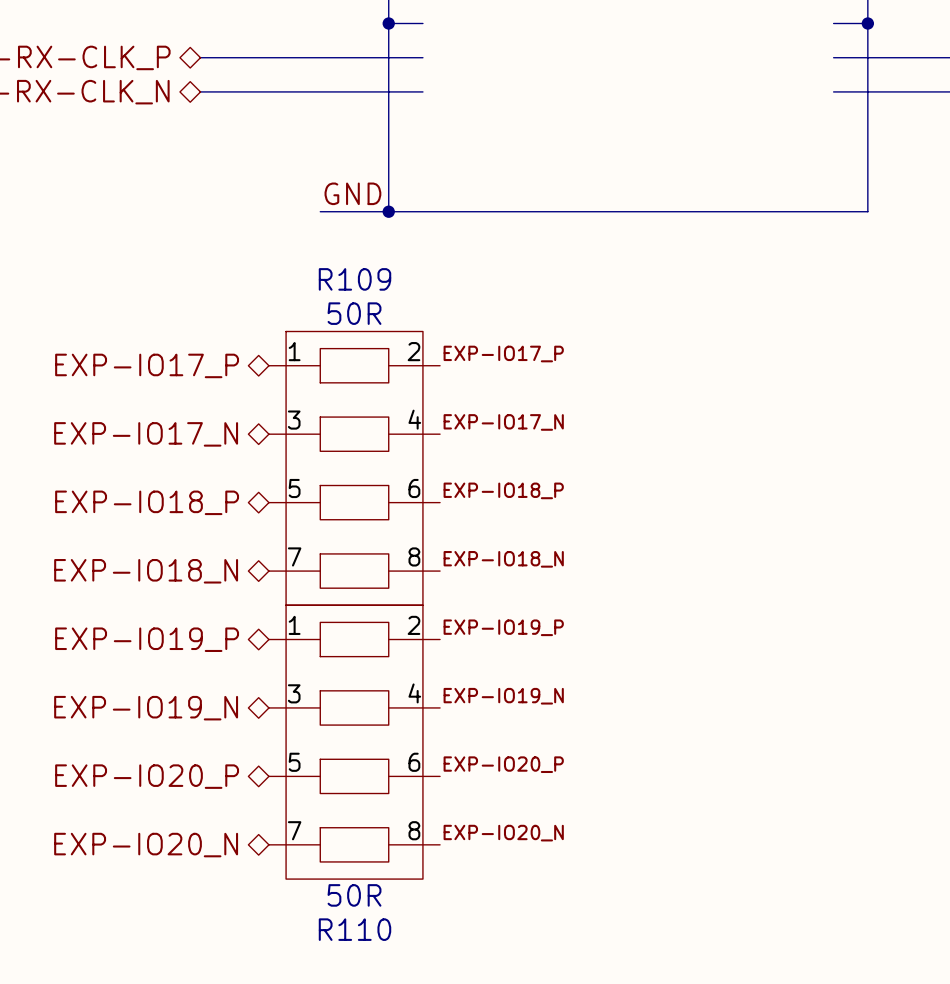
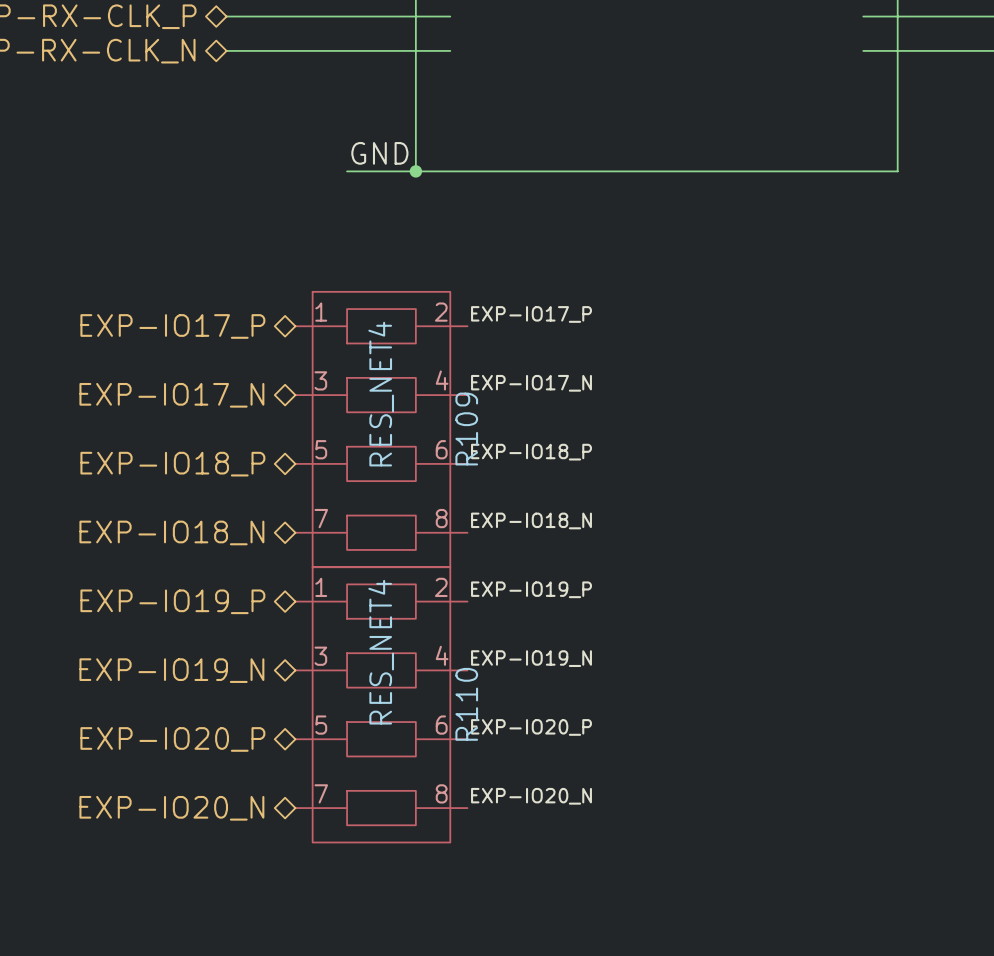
R109 name rotation: 0° (354, 279) -> 90° counterclockwise (466, 429)
R109 name position: R109 (354, 279) -> R109 (466, 429)
R109 value: 50R (354, 313) -> RES_NET4 (381, 394)
R110 value: 50R (354, 895) -> RES_NET4 (381, 652)
R110 name rotation: 0° (354, 929) -> 90° counterclockwise (466, 704)
R110 name position: R110 (354, 929) -> R110 (466, 704)

